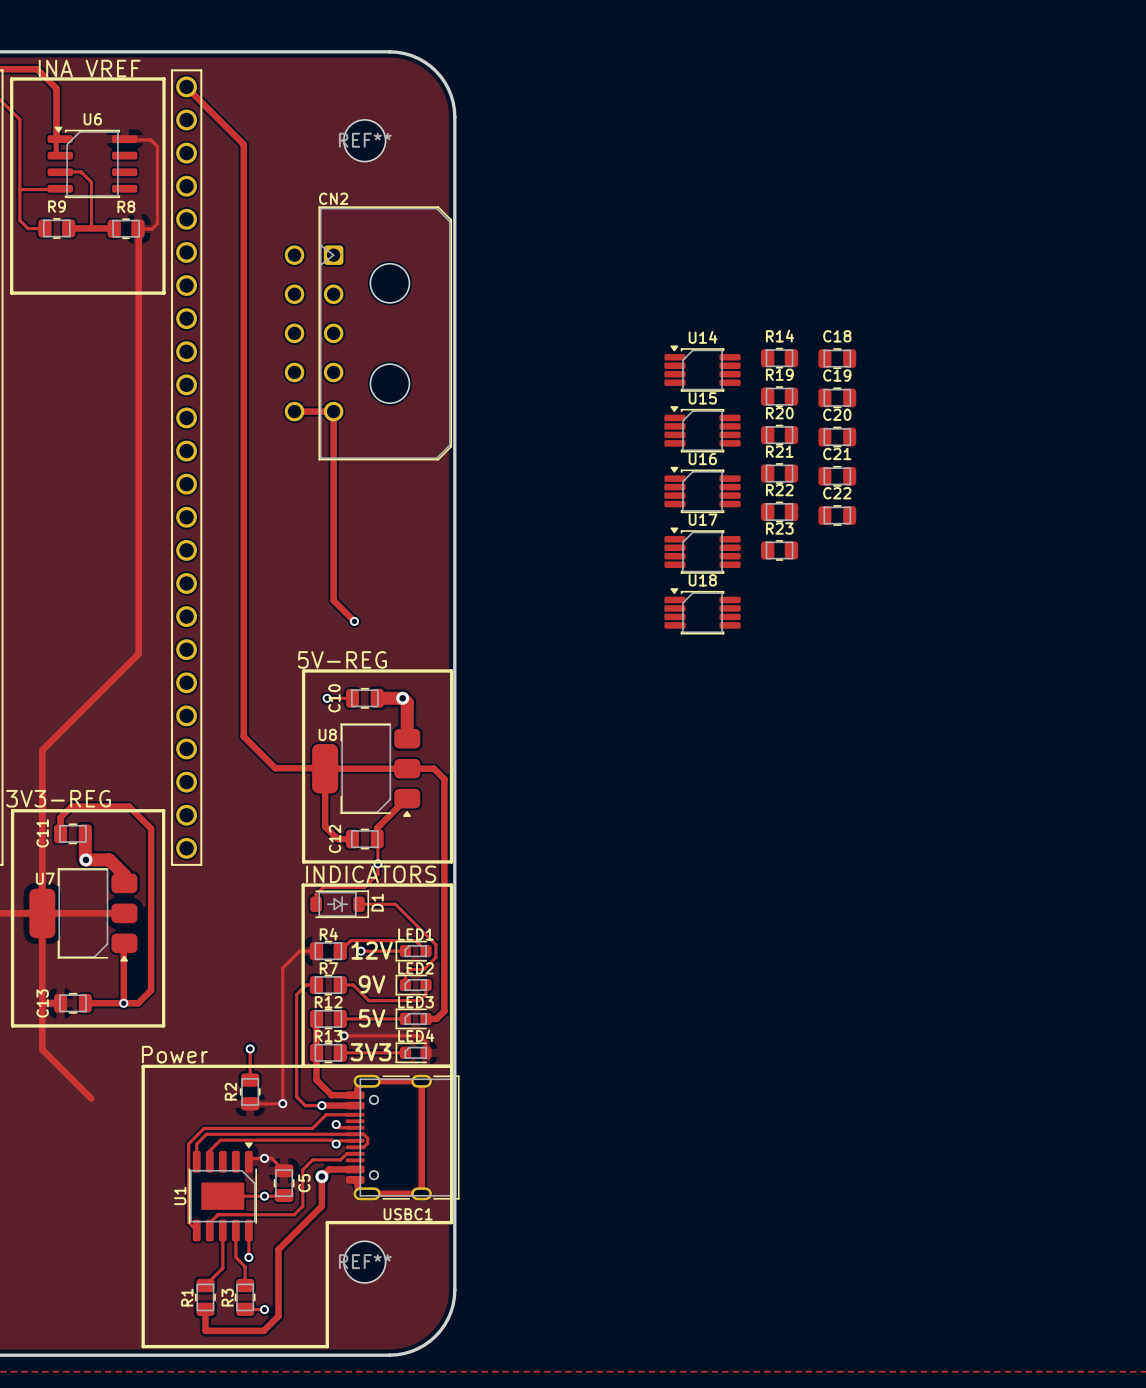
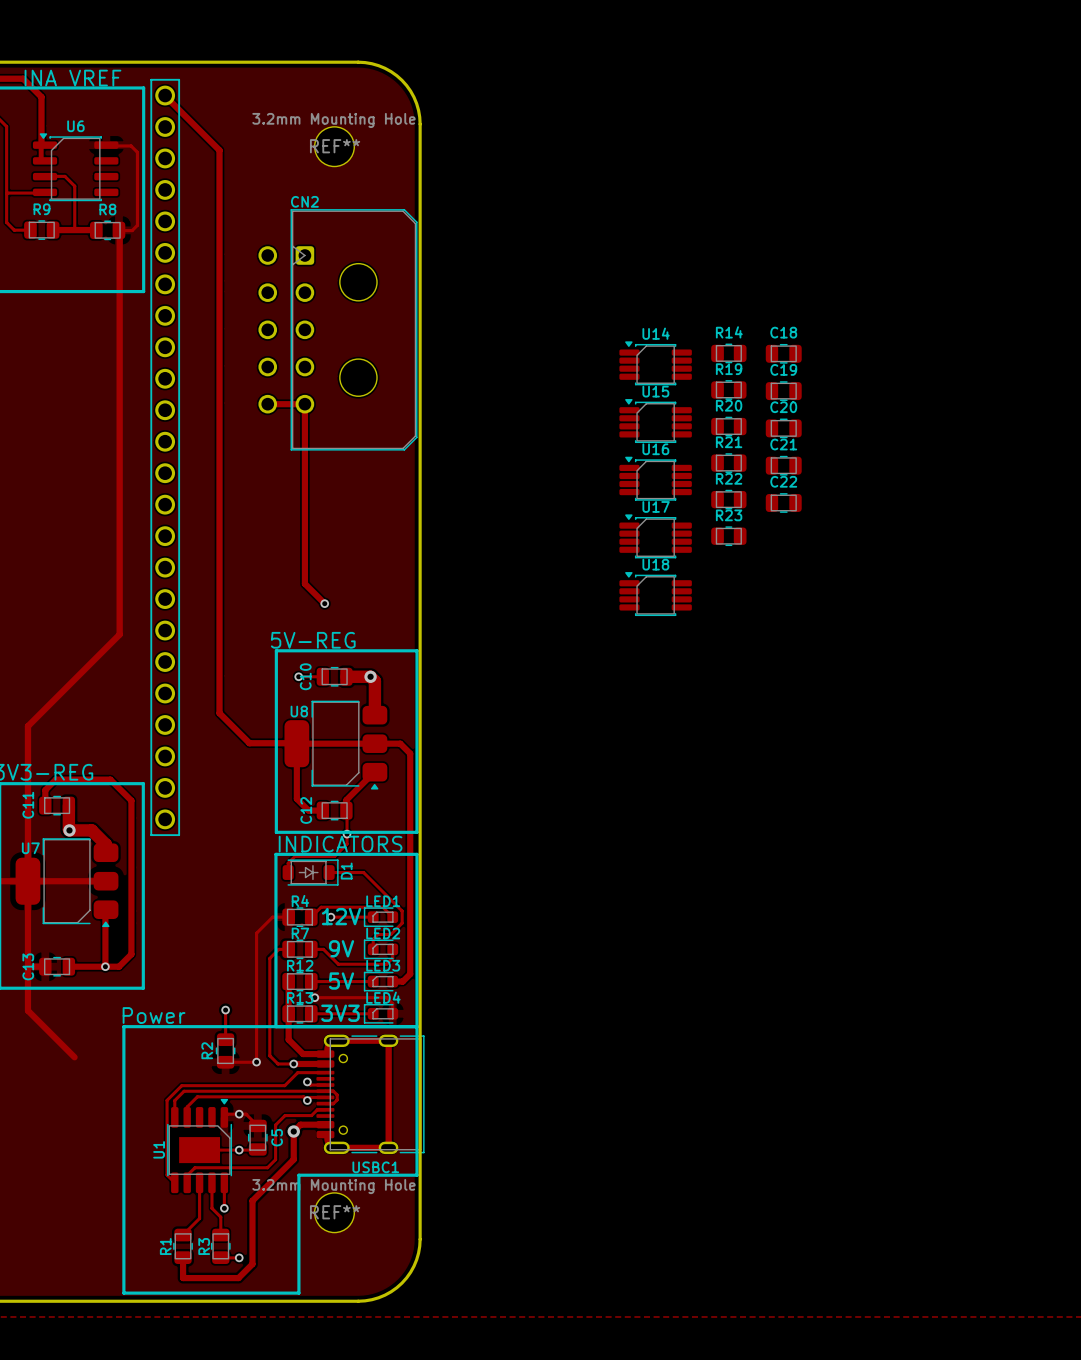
REF** text: none -> 3.2mm Mounting Hole (333, 120)
REF** text: none -> 3.2mm Mounting Hole (333, 1186)

